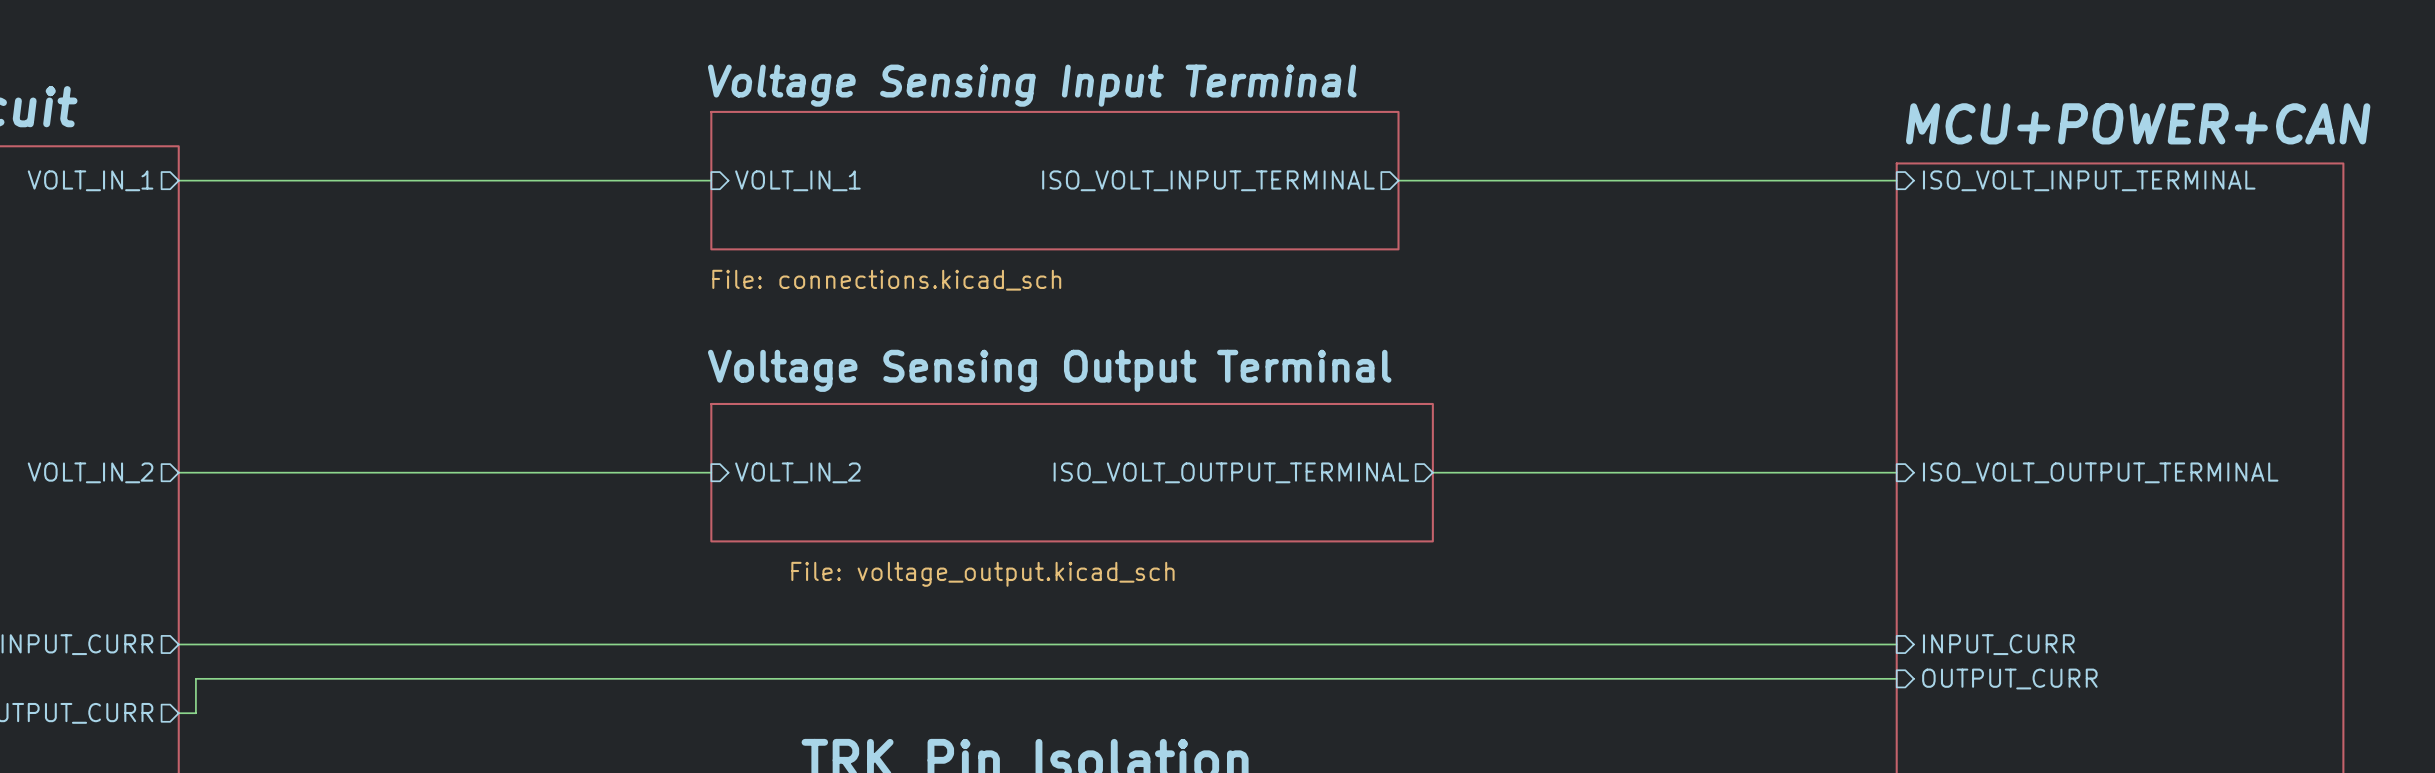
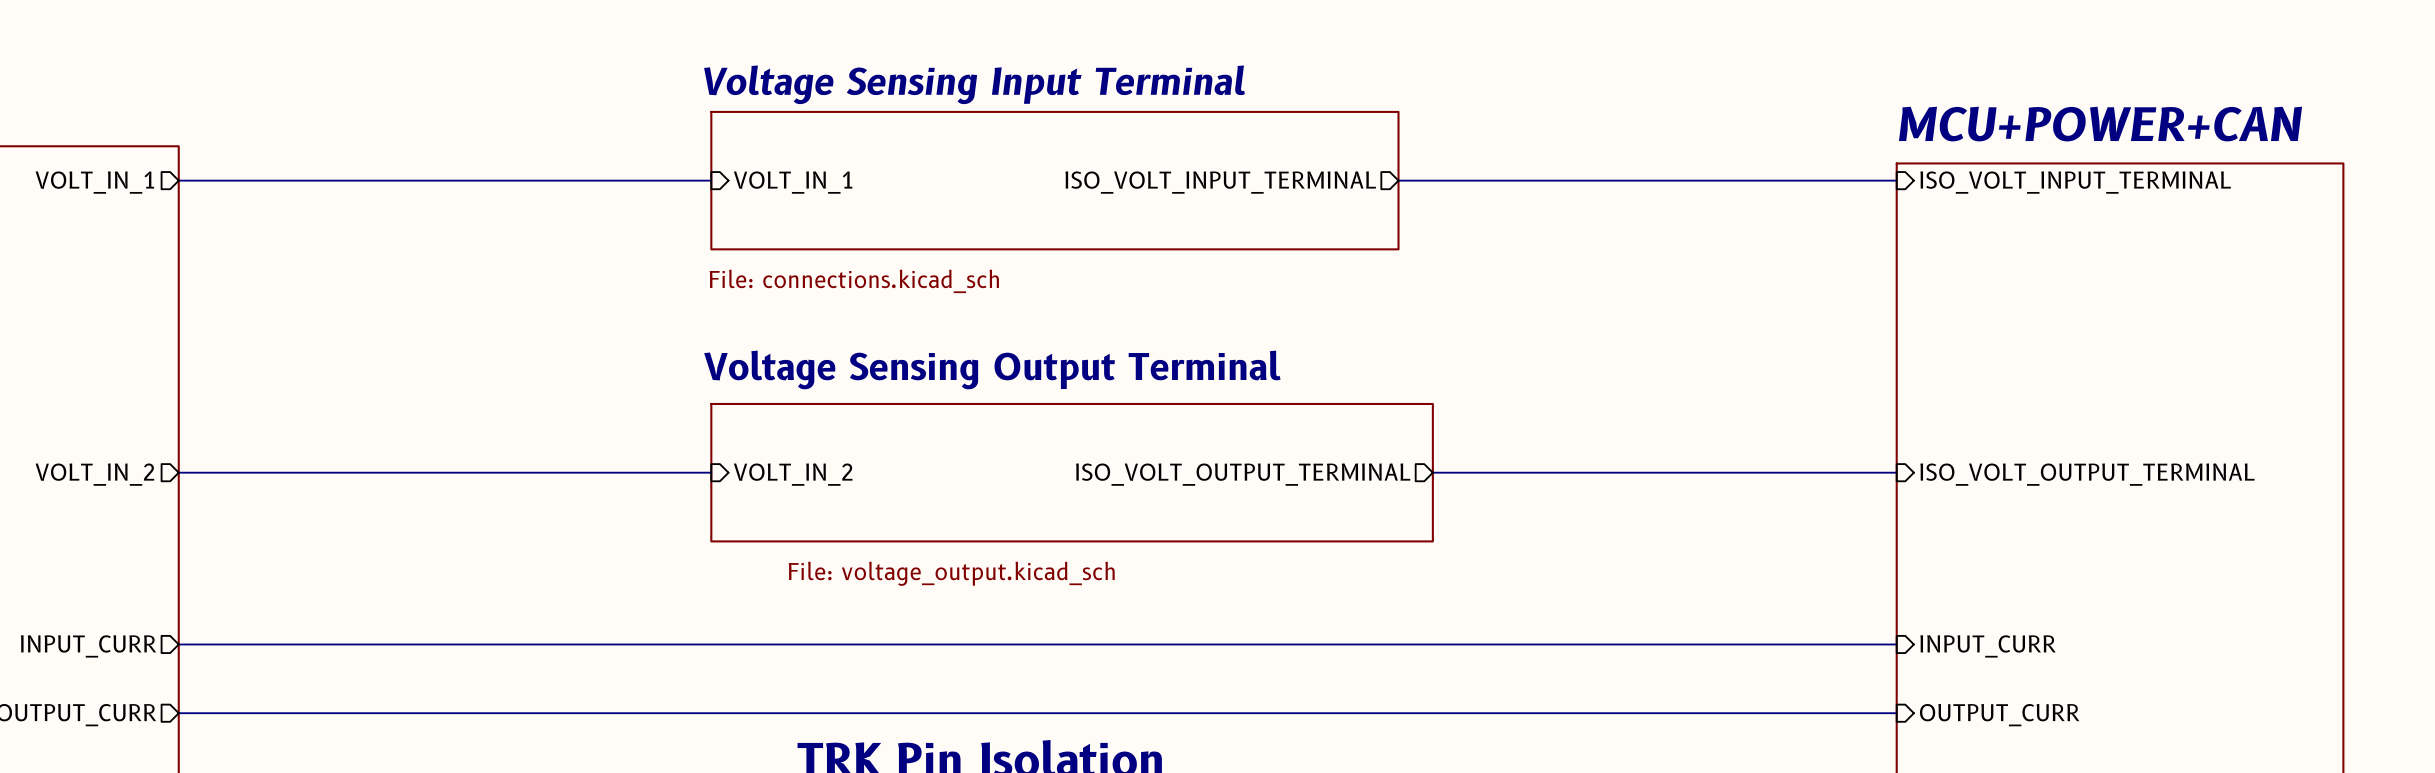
wire: (1896, 678) (195, 678) (195, 713) -> (1896, 713) (195, 713)
sheet pin position: OUTPUT_CURR (2009, 679) -> OUTPUT_CURR (1999, 715)

